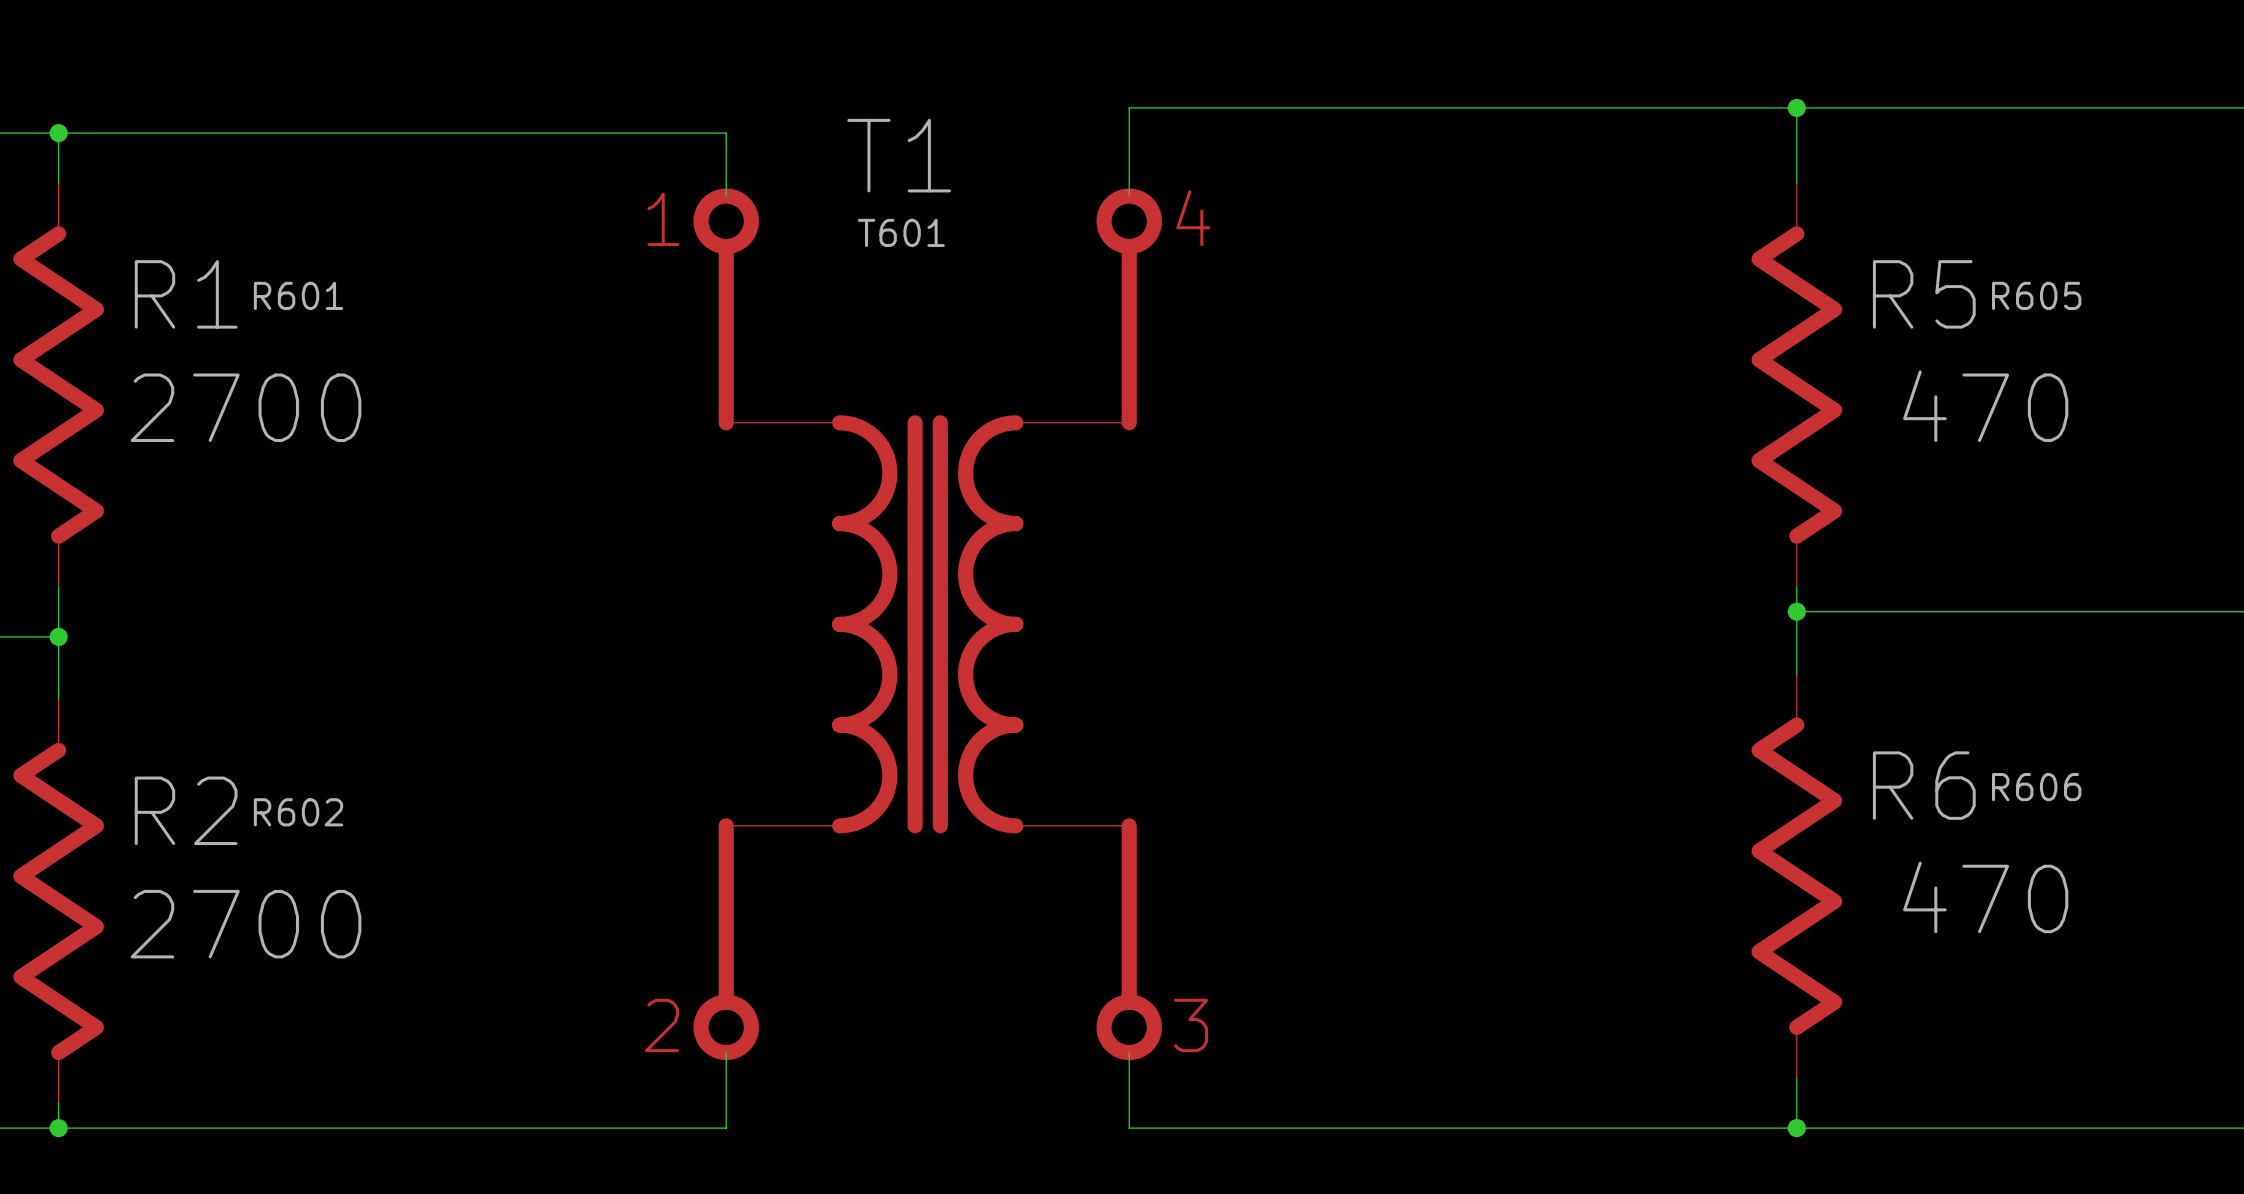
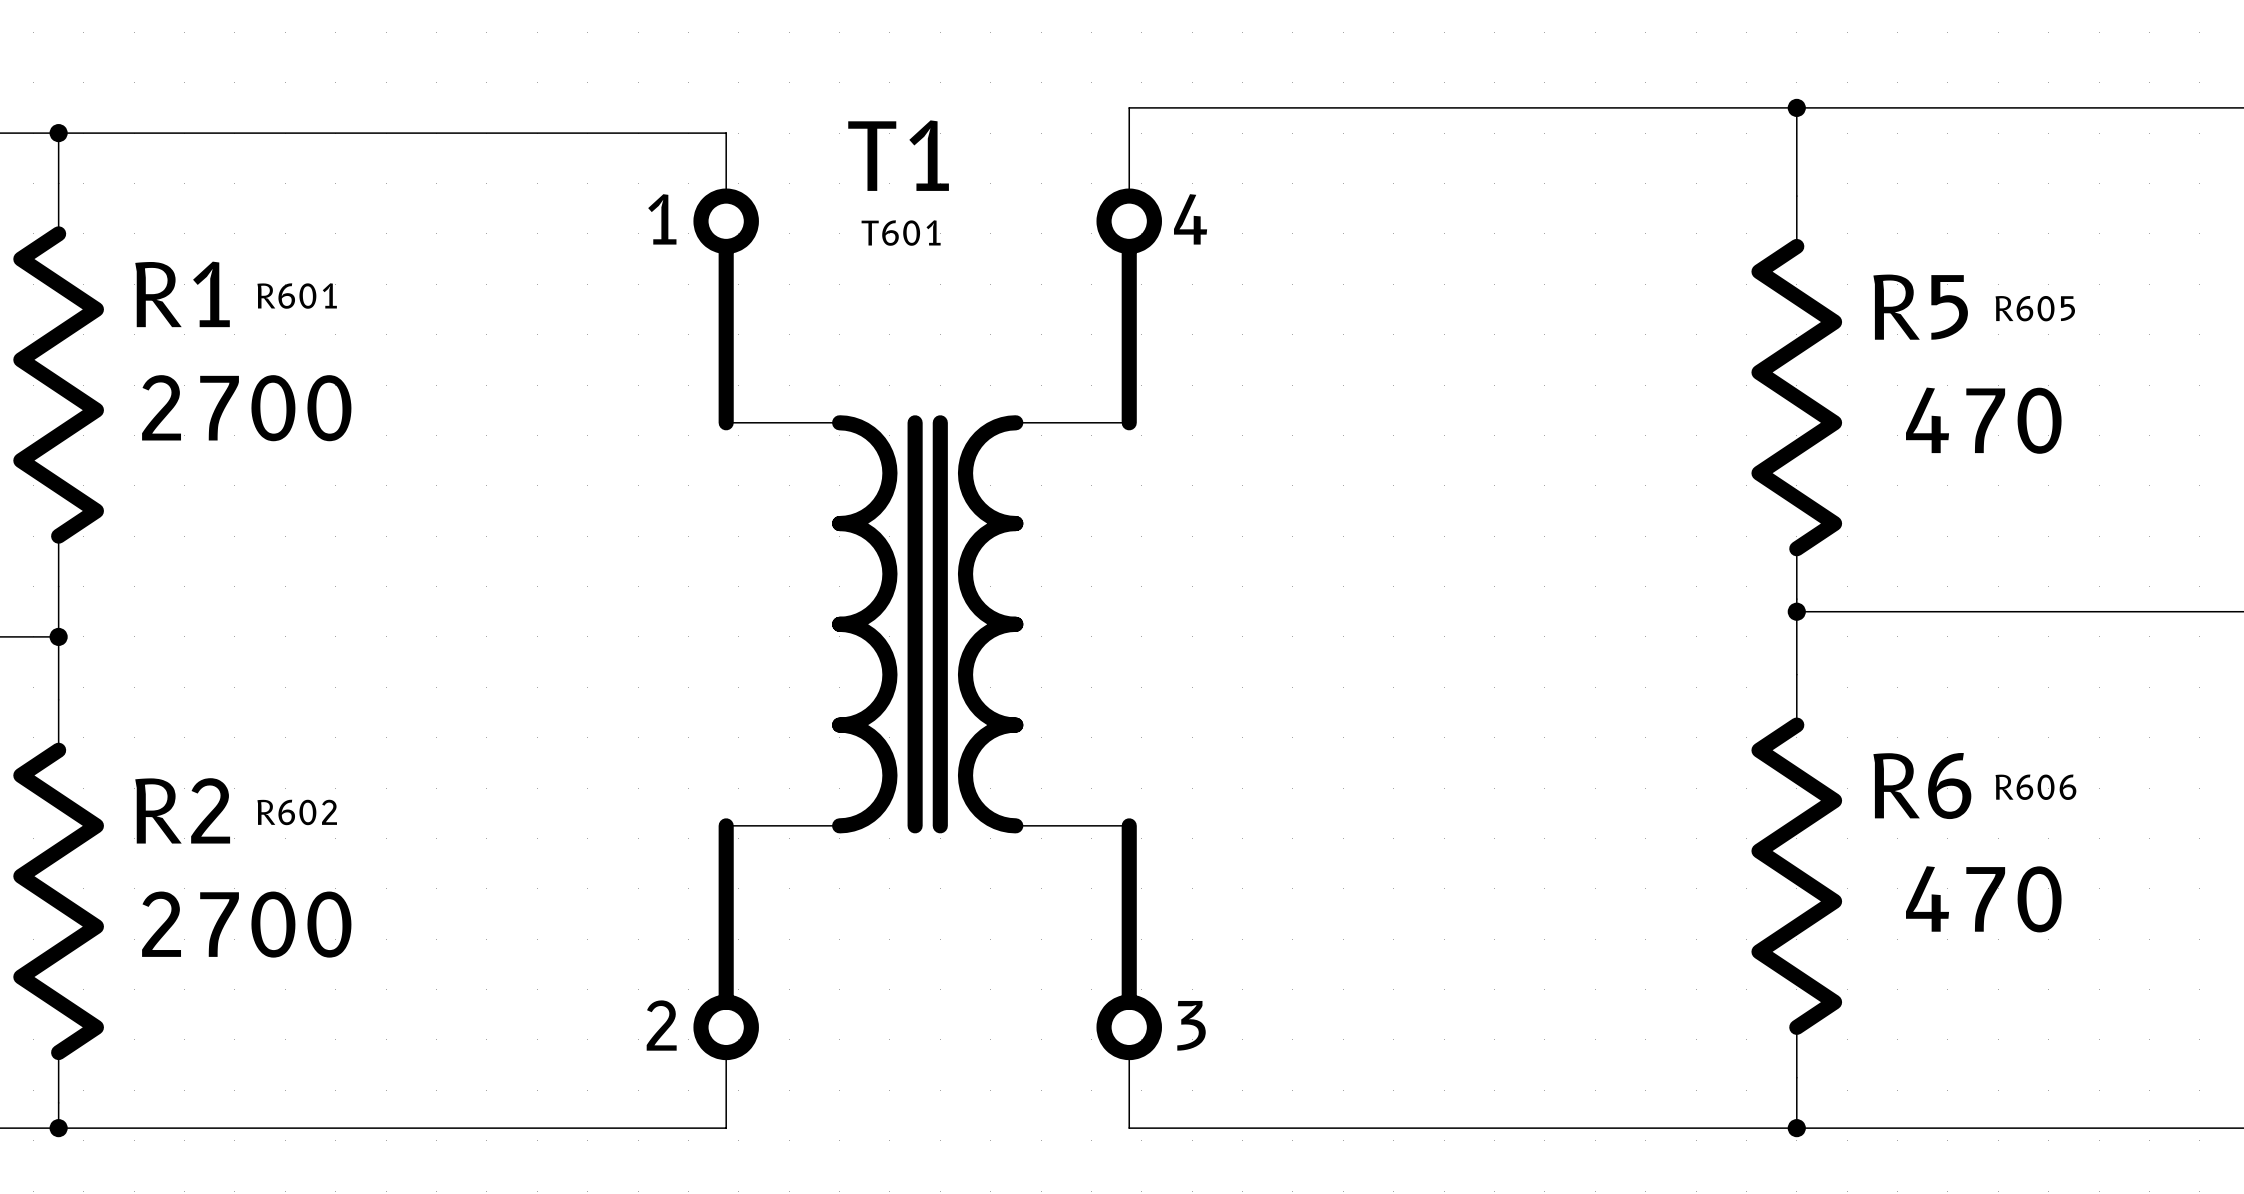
R605 position: (1796, 385) -> (1796, 397)

